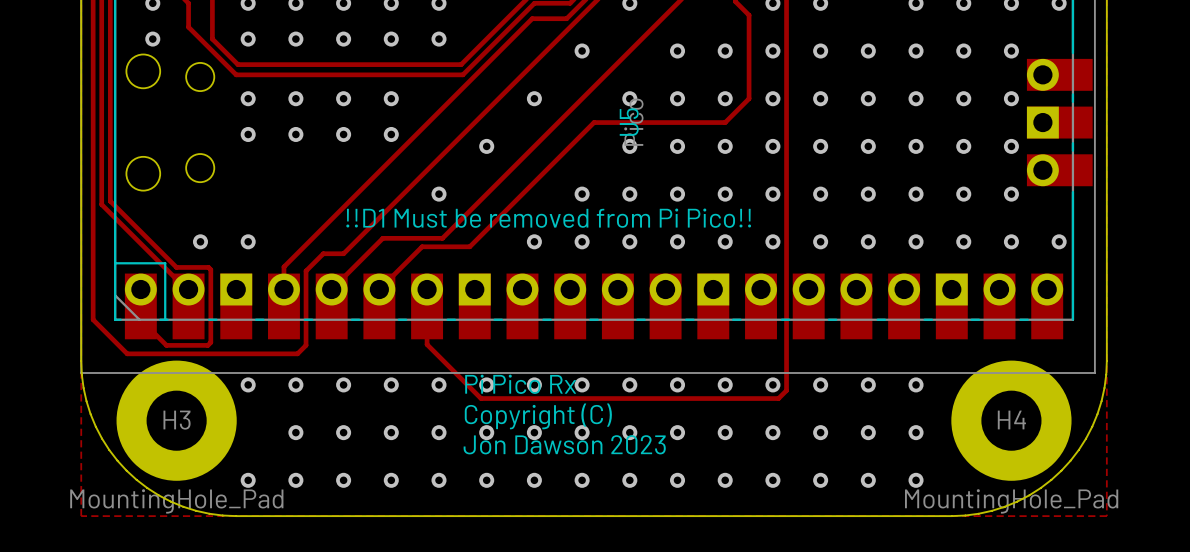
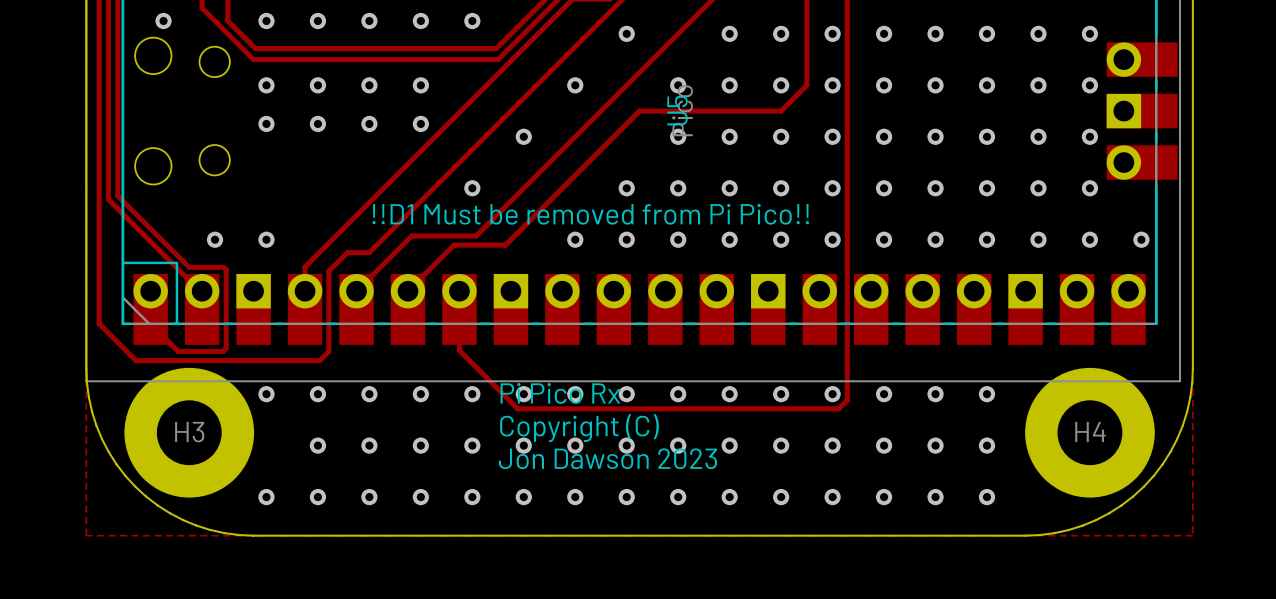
H3 value: MountingHole_Pad (176, 501) -> none
H4 value: MountingHole_Pad (1011, 501) -> none

